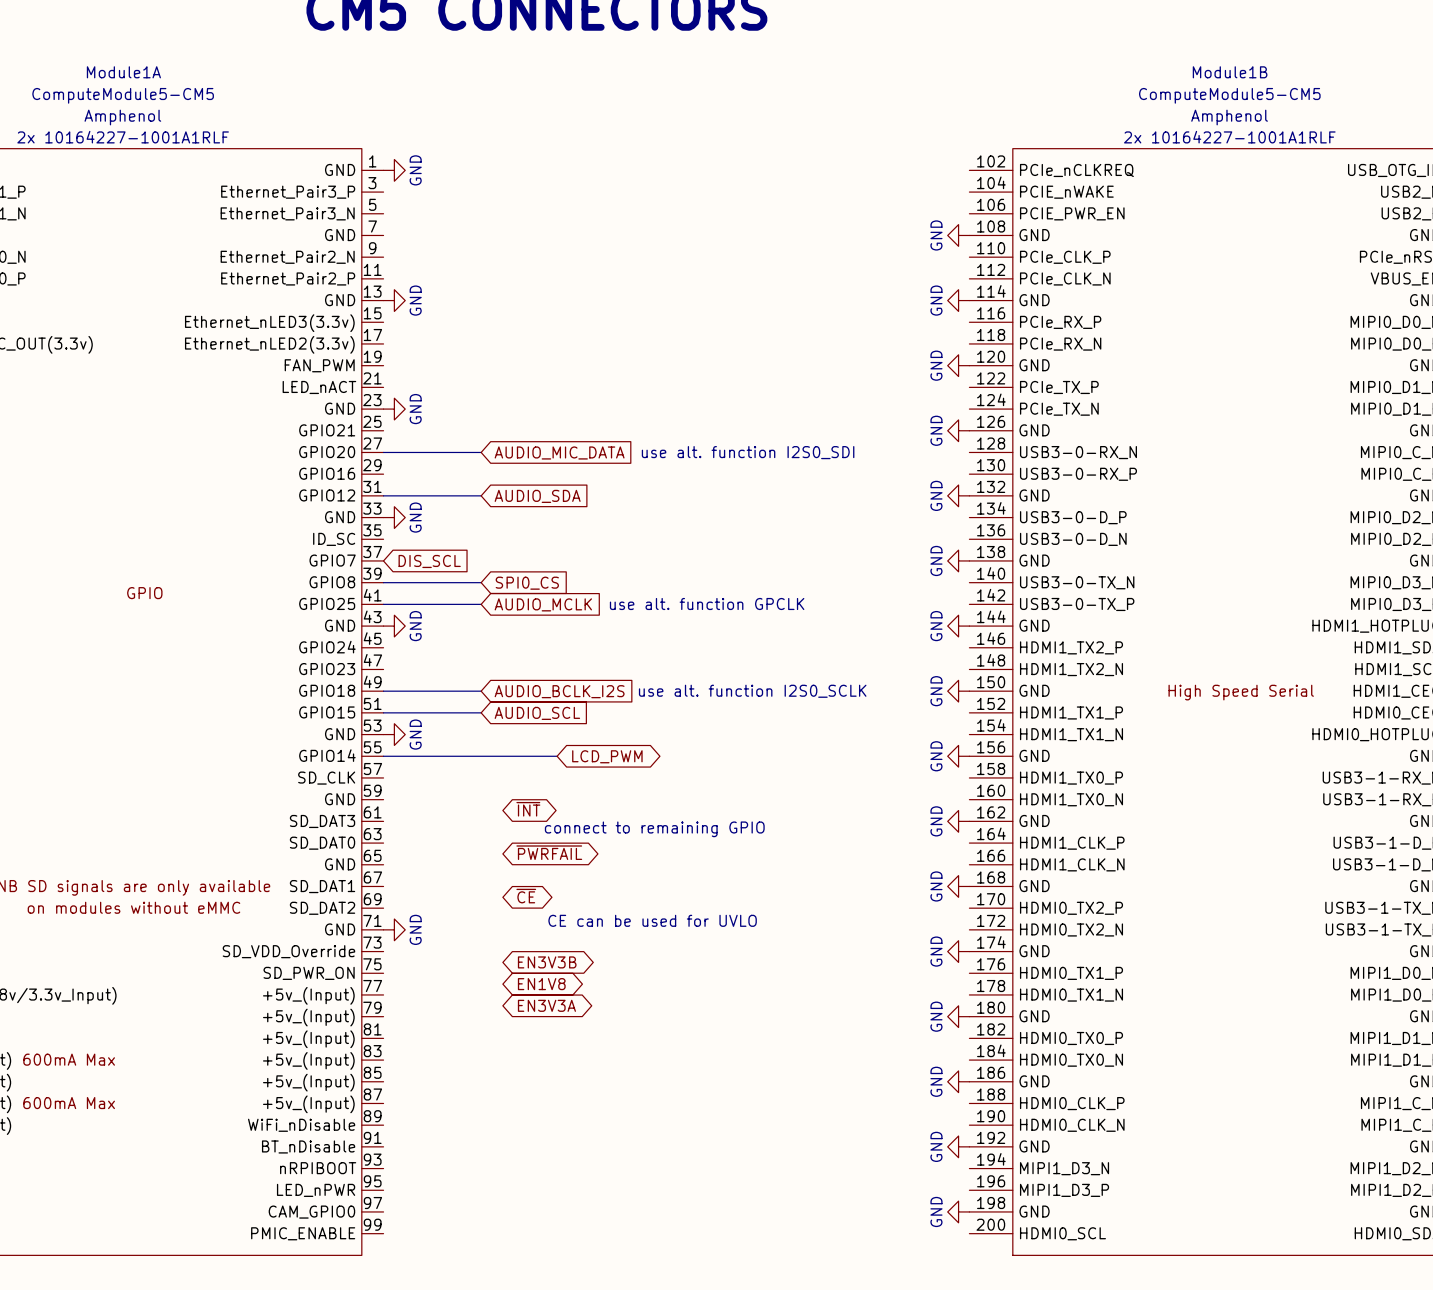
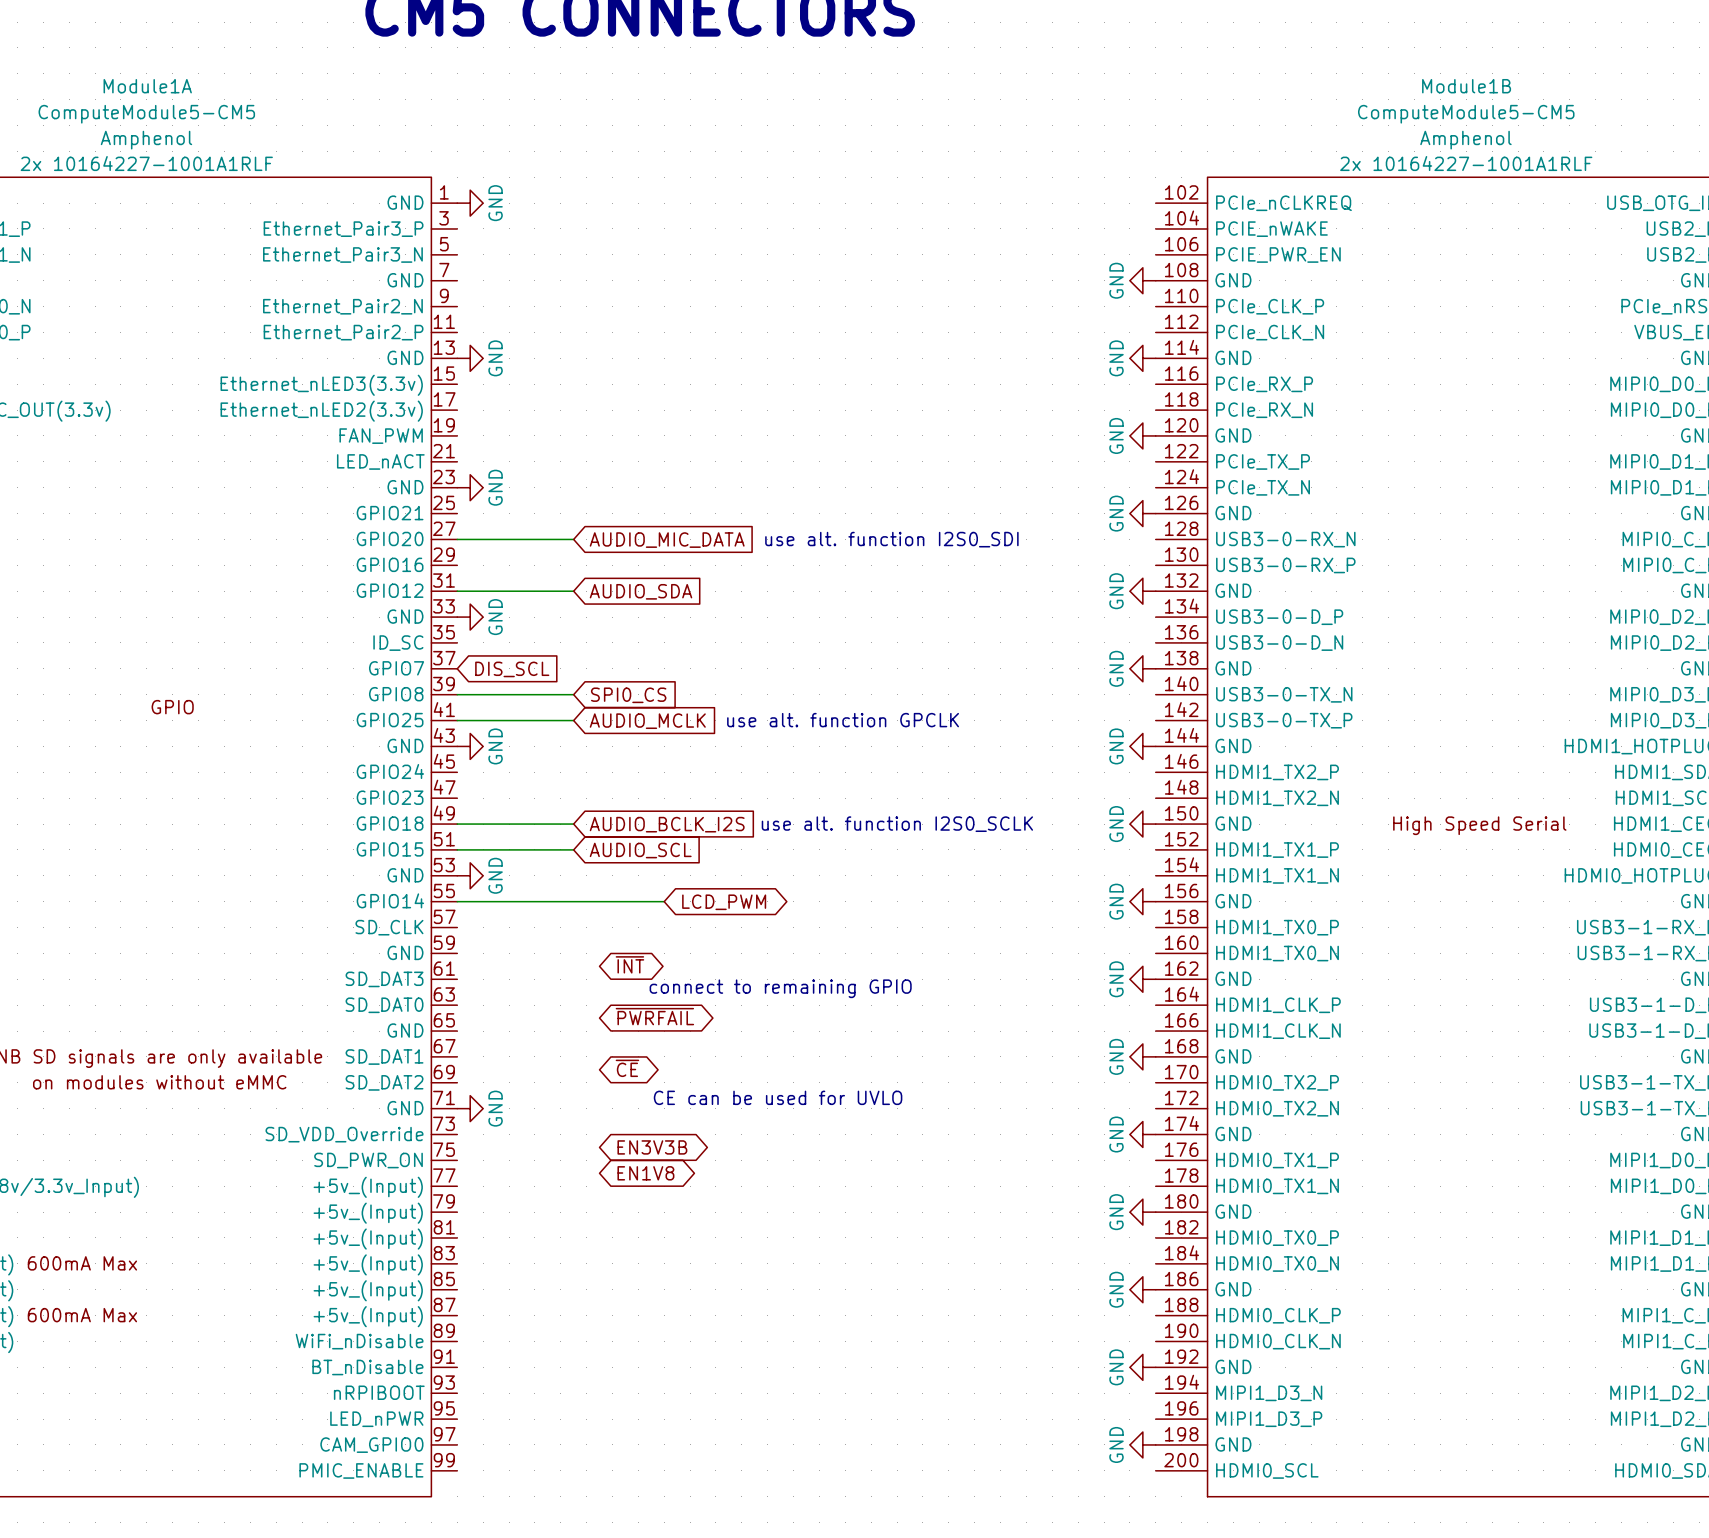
global label: EN3V3A (546, 1005) -> none

